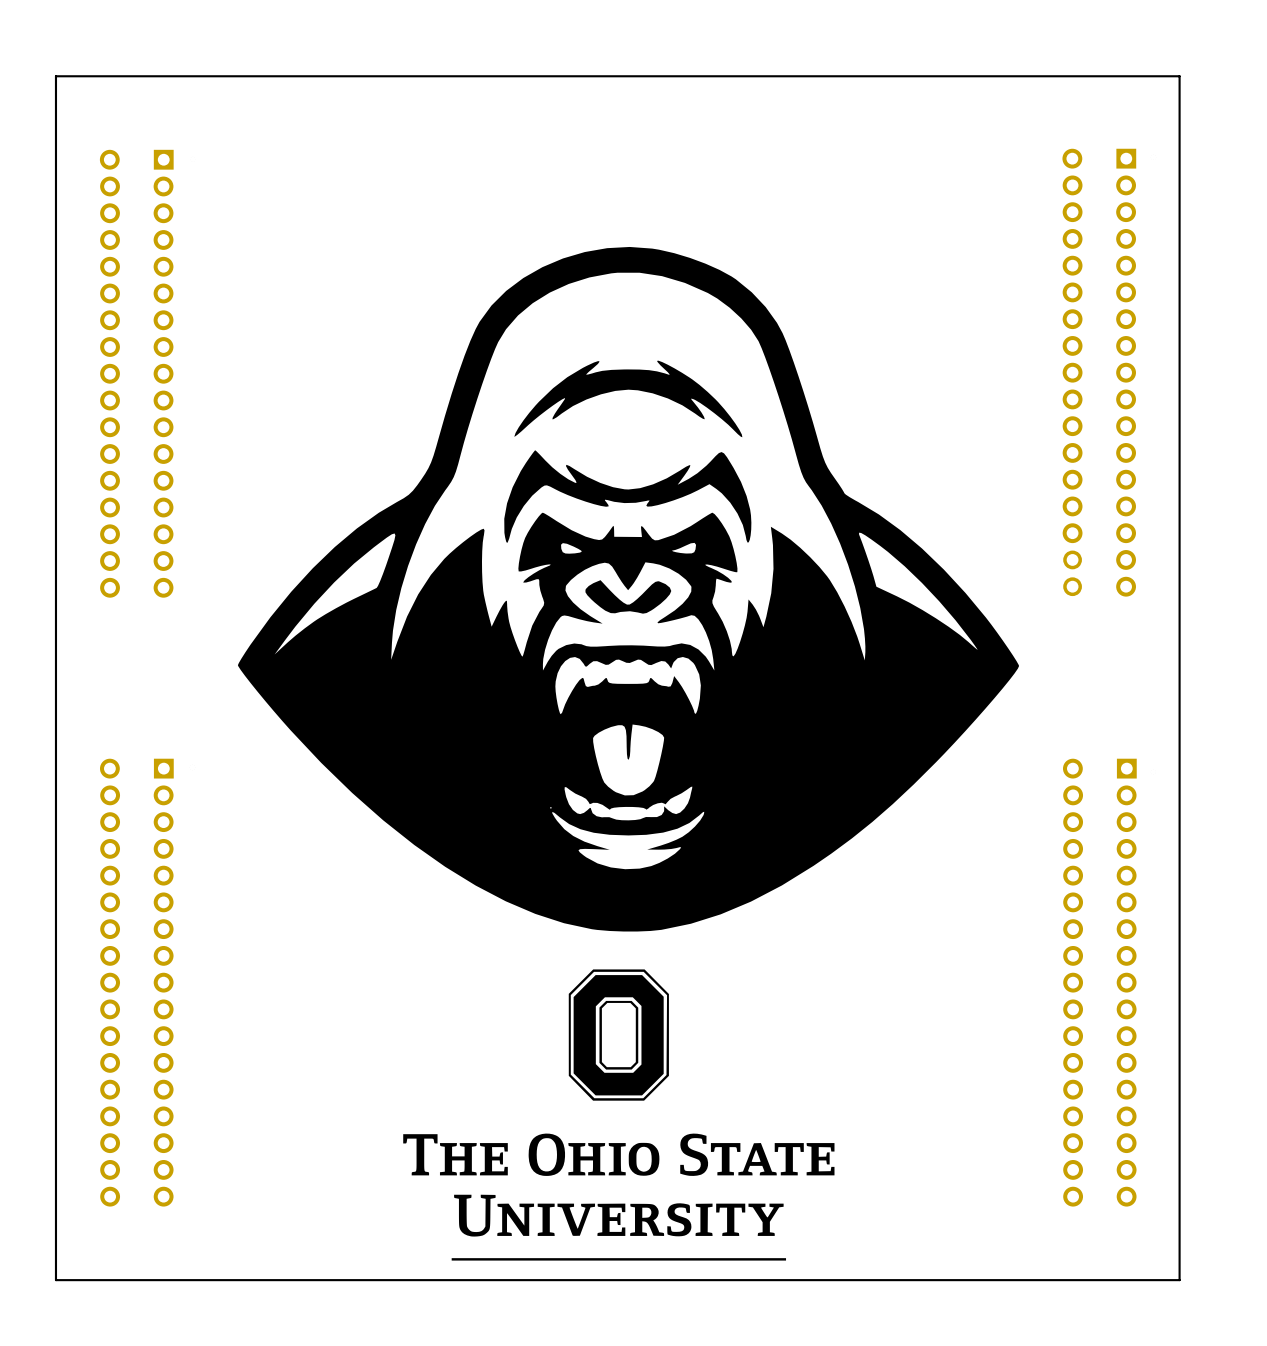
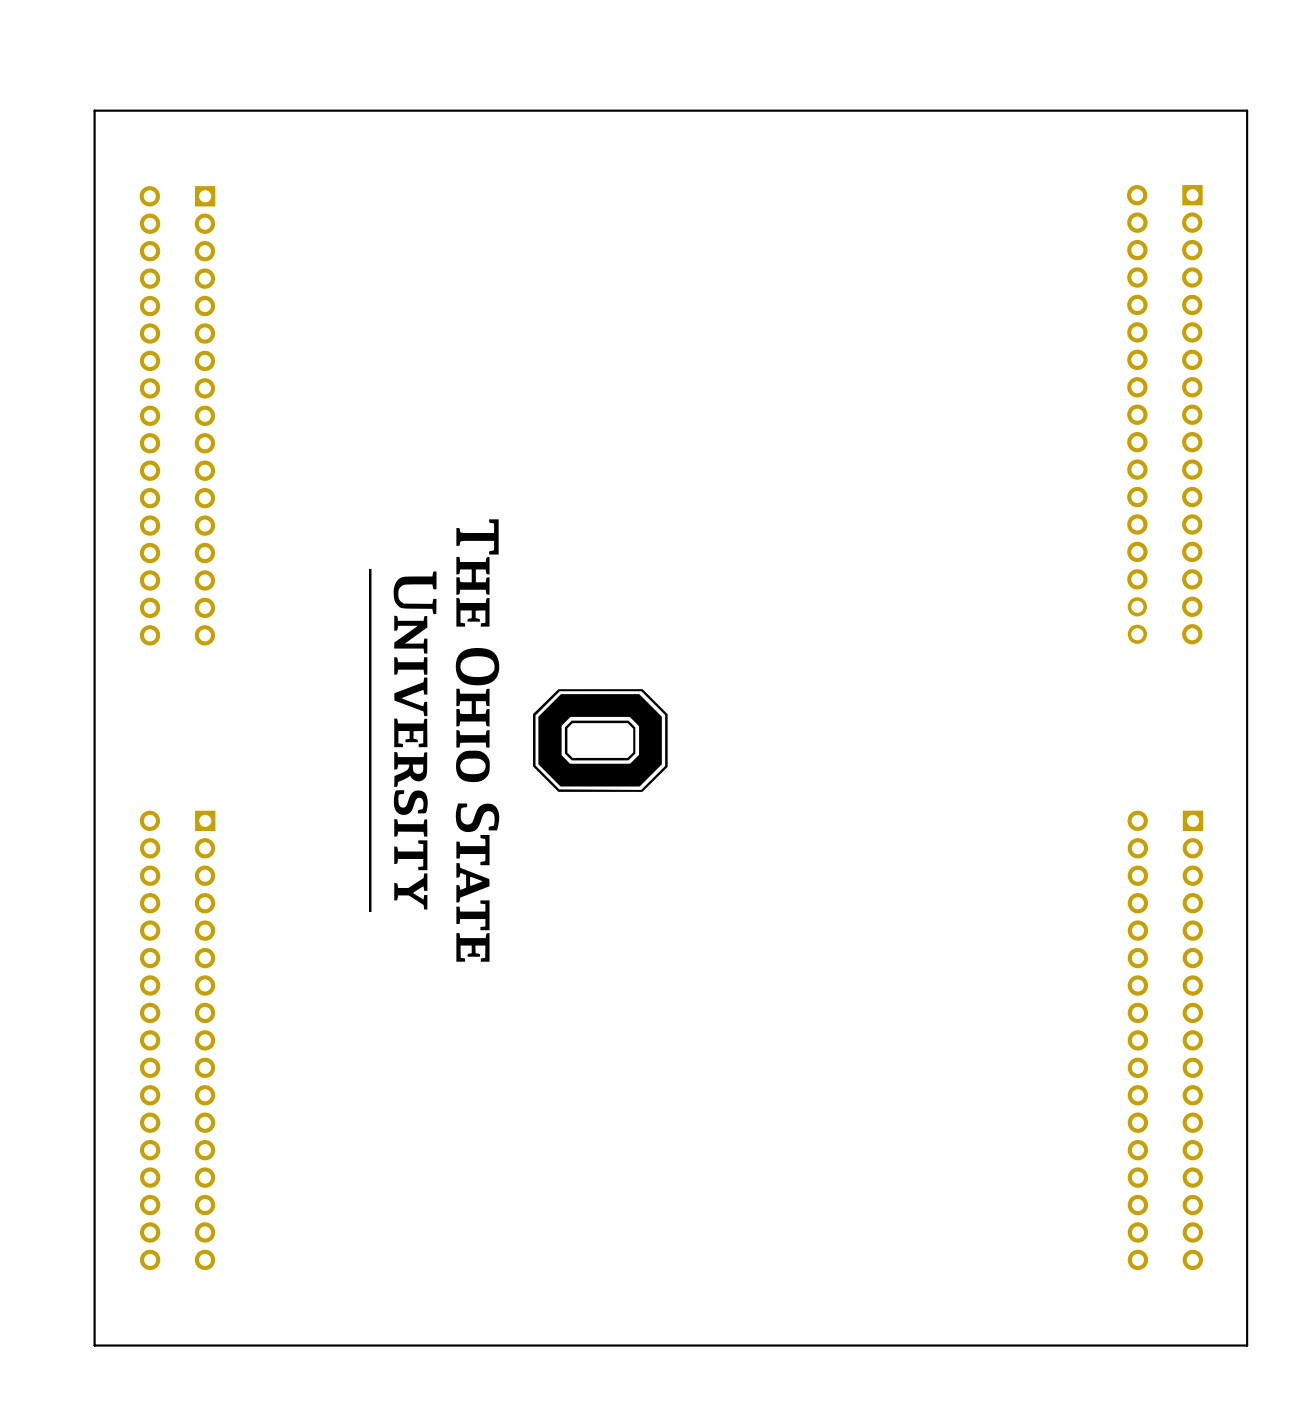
drawing: [237, 246, 1020, 932] -> none
drawing: none -> [368, 519, 668, 962]
drawing: [403, 969, 835, 1261] -> none

